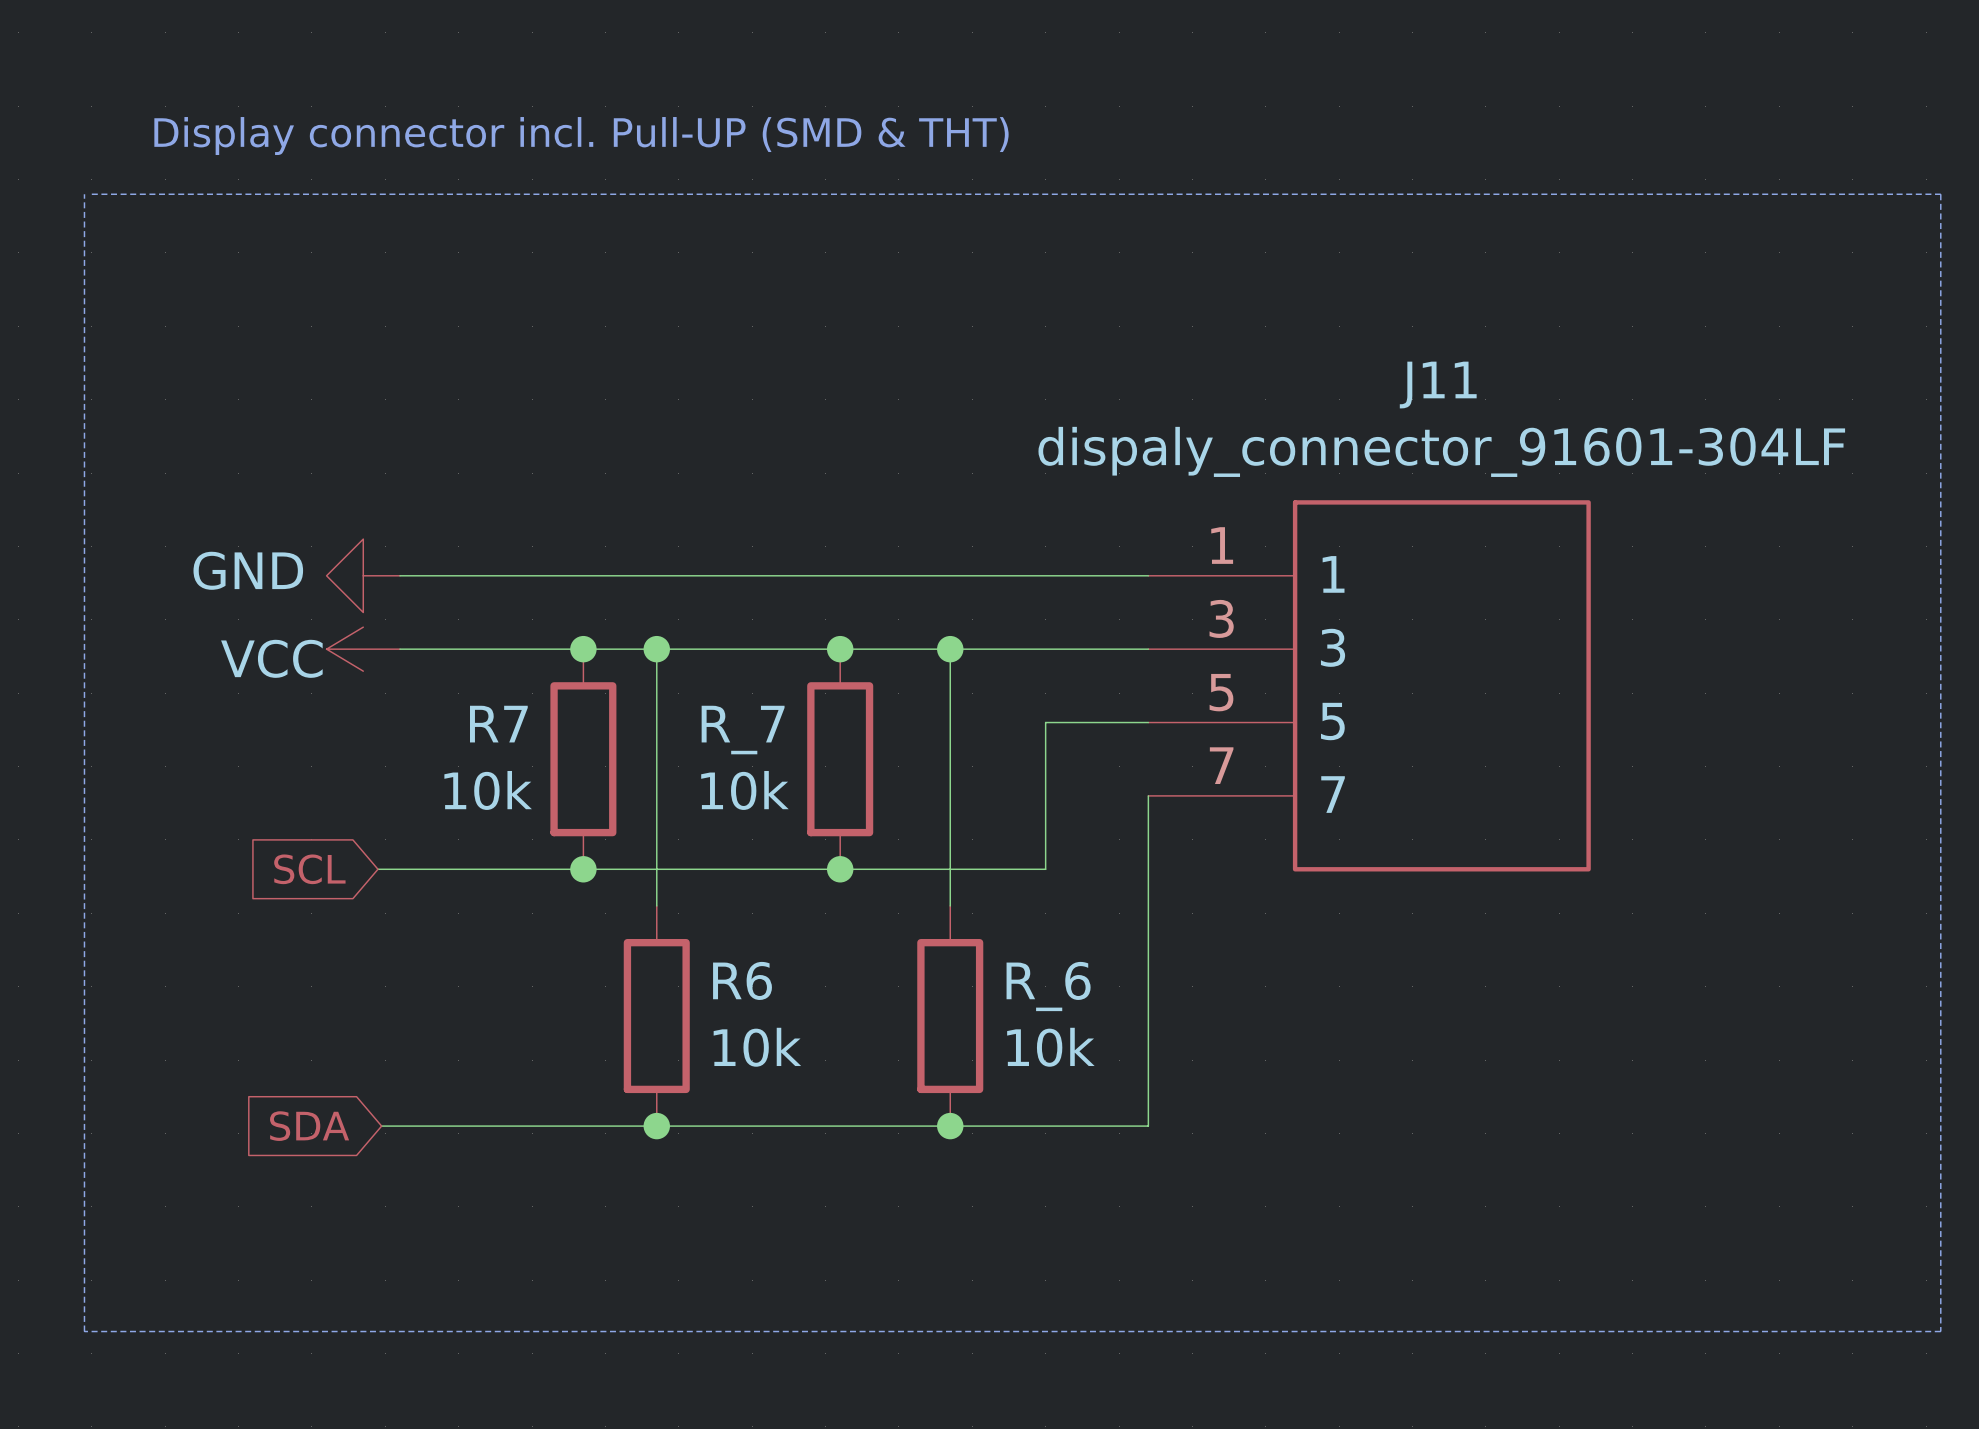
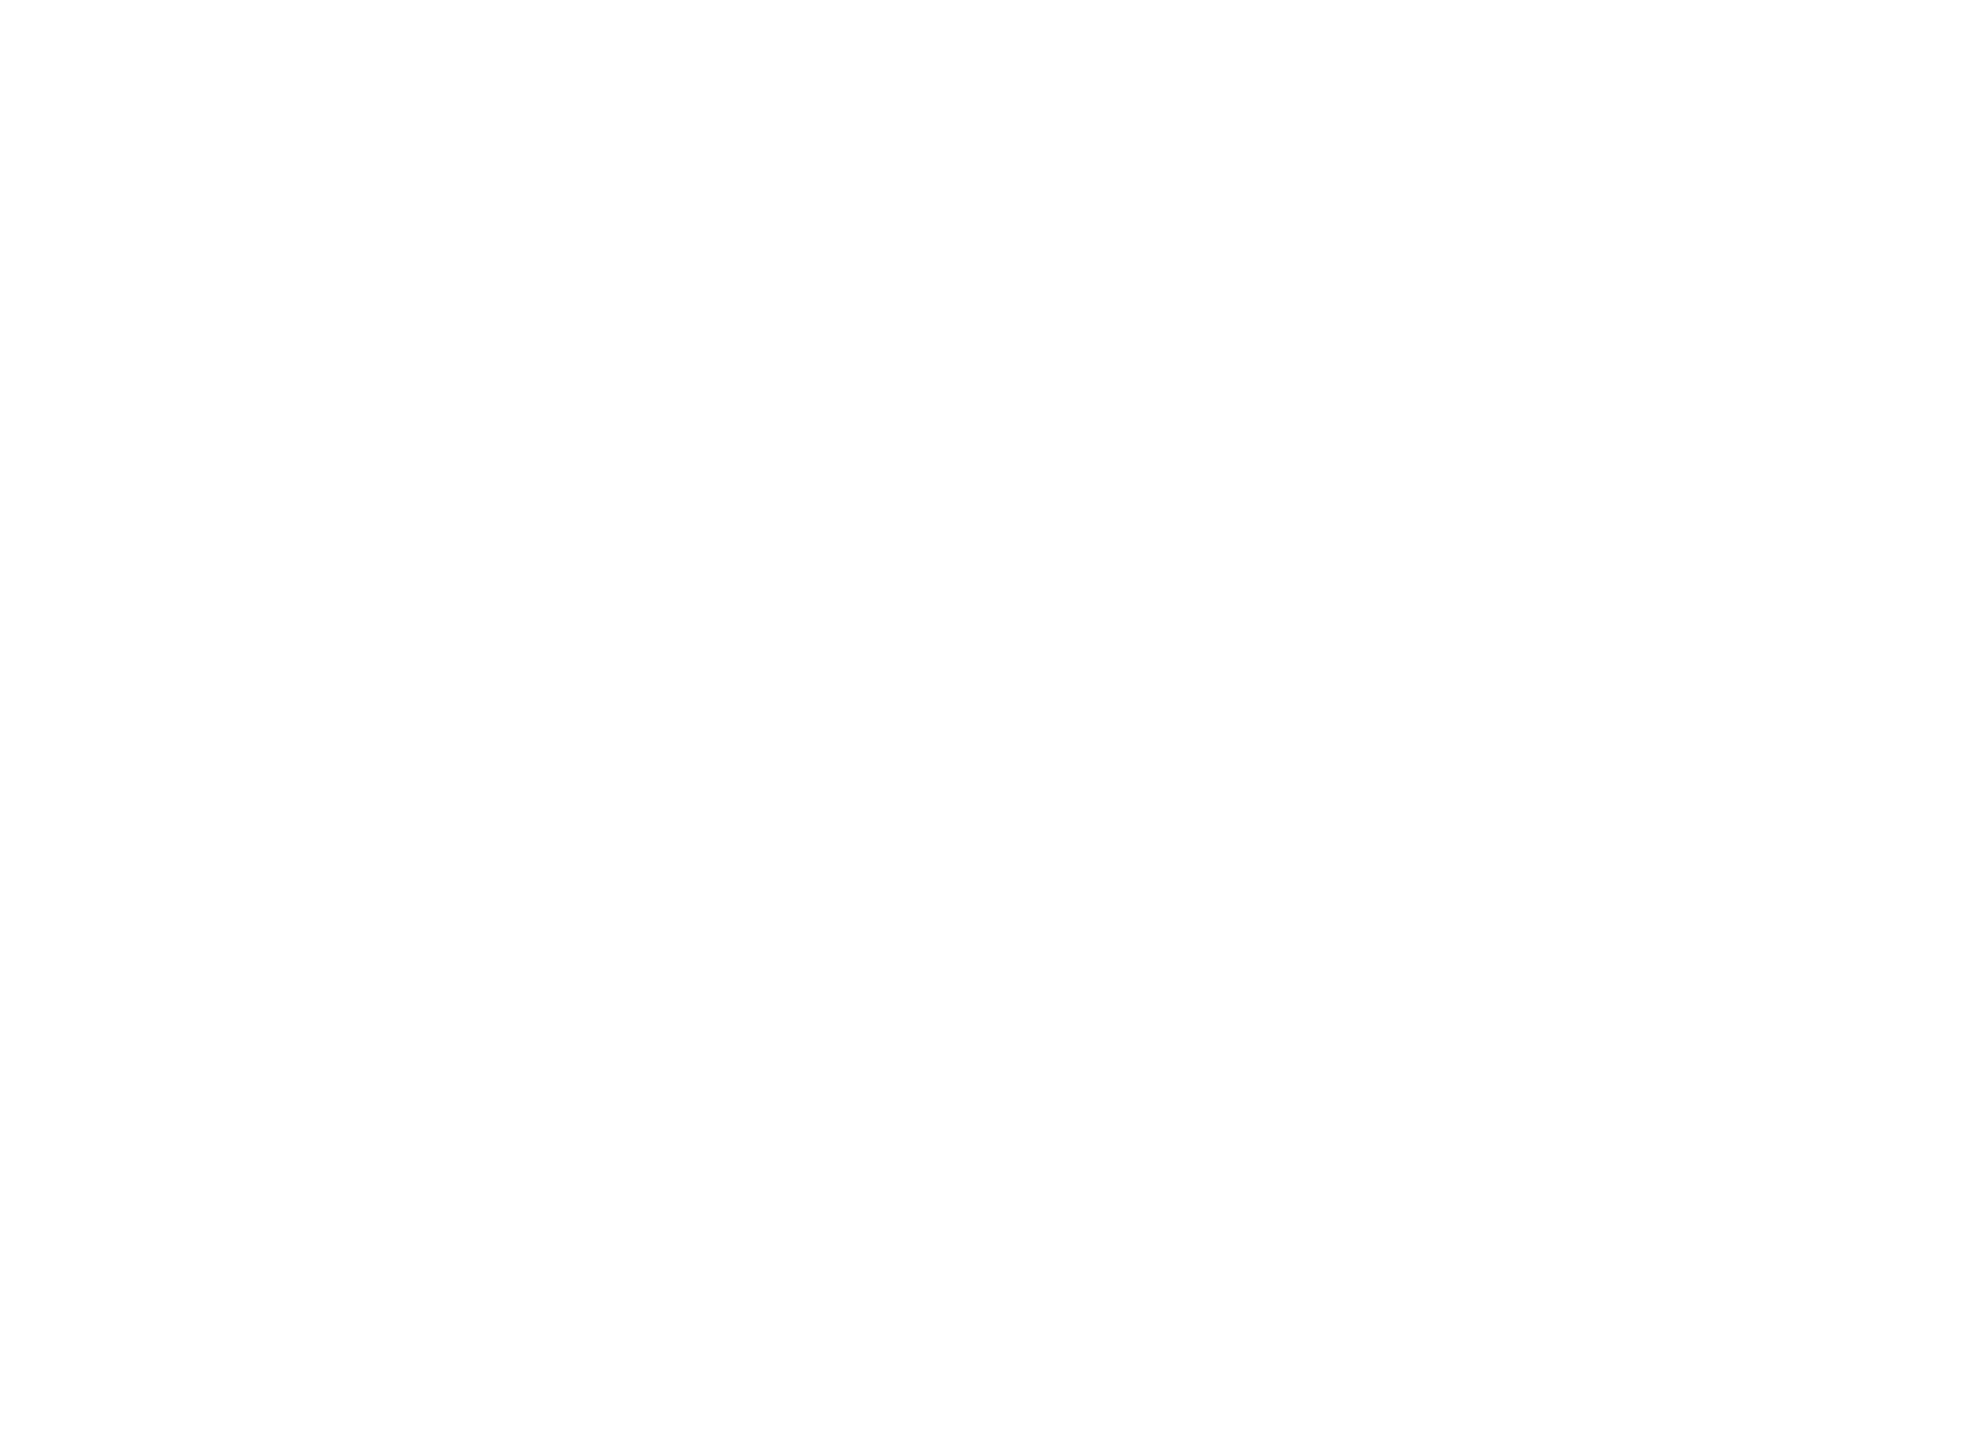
text: Display connector incl. Pull-UP (SMD & THT) (581, 136) -> none
line: (84, 194) (84, 1331) (1940, 1331) (1940, 194) (91, 194) -> none
power symbol: GND (363, 575) -> none
wire: (399, 575) (1148, 575) -> none
power symbol: VCC (363, 649) -> none
wire: (399, 649) (1148, 649) -> none
junction: (583, 649) -> none
wire: (656, 649) (656, 905) -> none
junction: (656, 649) -> none
junction: (840, 649) -> none
wire: (950, 649) (950, 905) -> none
junction: (950, 649) -> none
J11: dispaly_connector_91601-304LF (1369, 685) -> none
wire: (1148, 722) (1045, 722) (1045, 869) (377, 869) -> none
R7: 10k (583, 759) -> none
R_7: 10k (840, 759) -> none
wire: (1148, 795) (1148, 1126) (381, 1126) -> none
global label: SCL (309, 869) -> none
junction: (583, 869) -> none
junction: (840, 869) -> none
R6: 10k (656, 1016) -> none
R_6: 10k (950, 1016) -> none
global label: SDA (309, 1126) -> none
junction: (656, 1126) -> none
junction: (950, 1126) -> none

